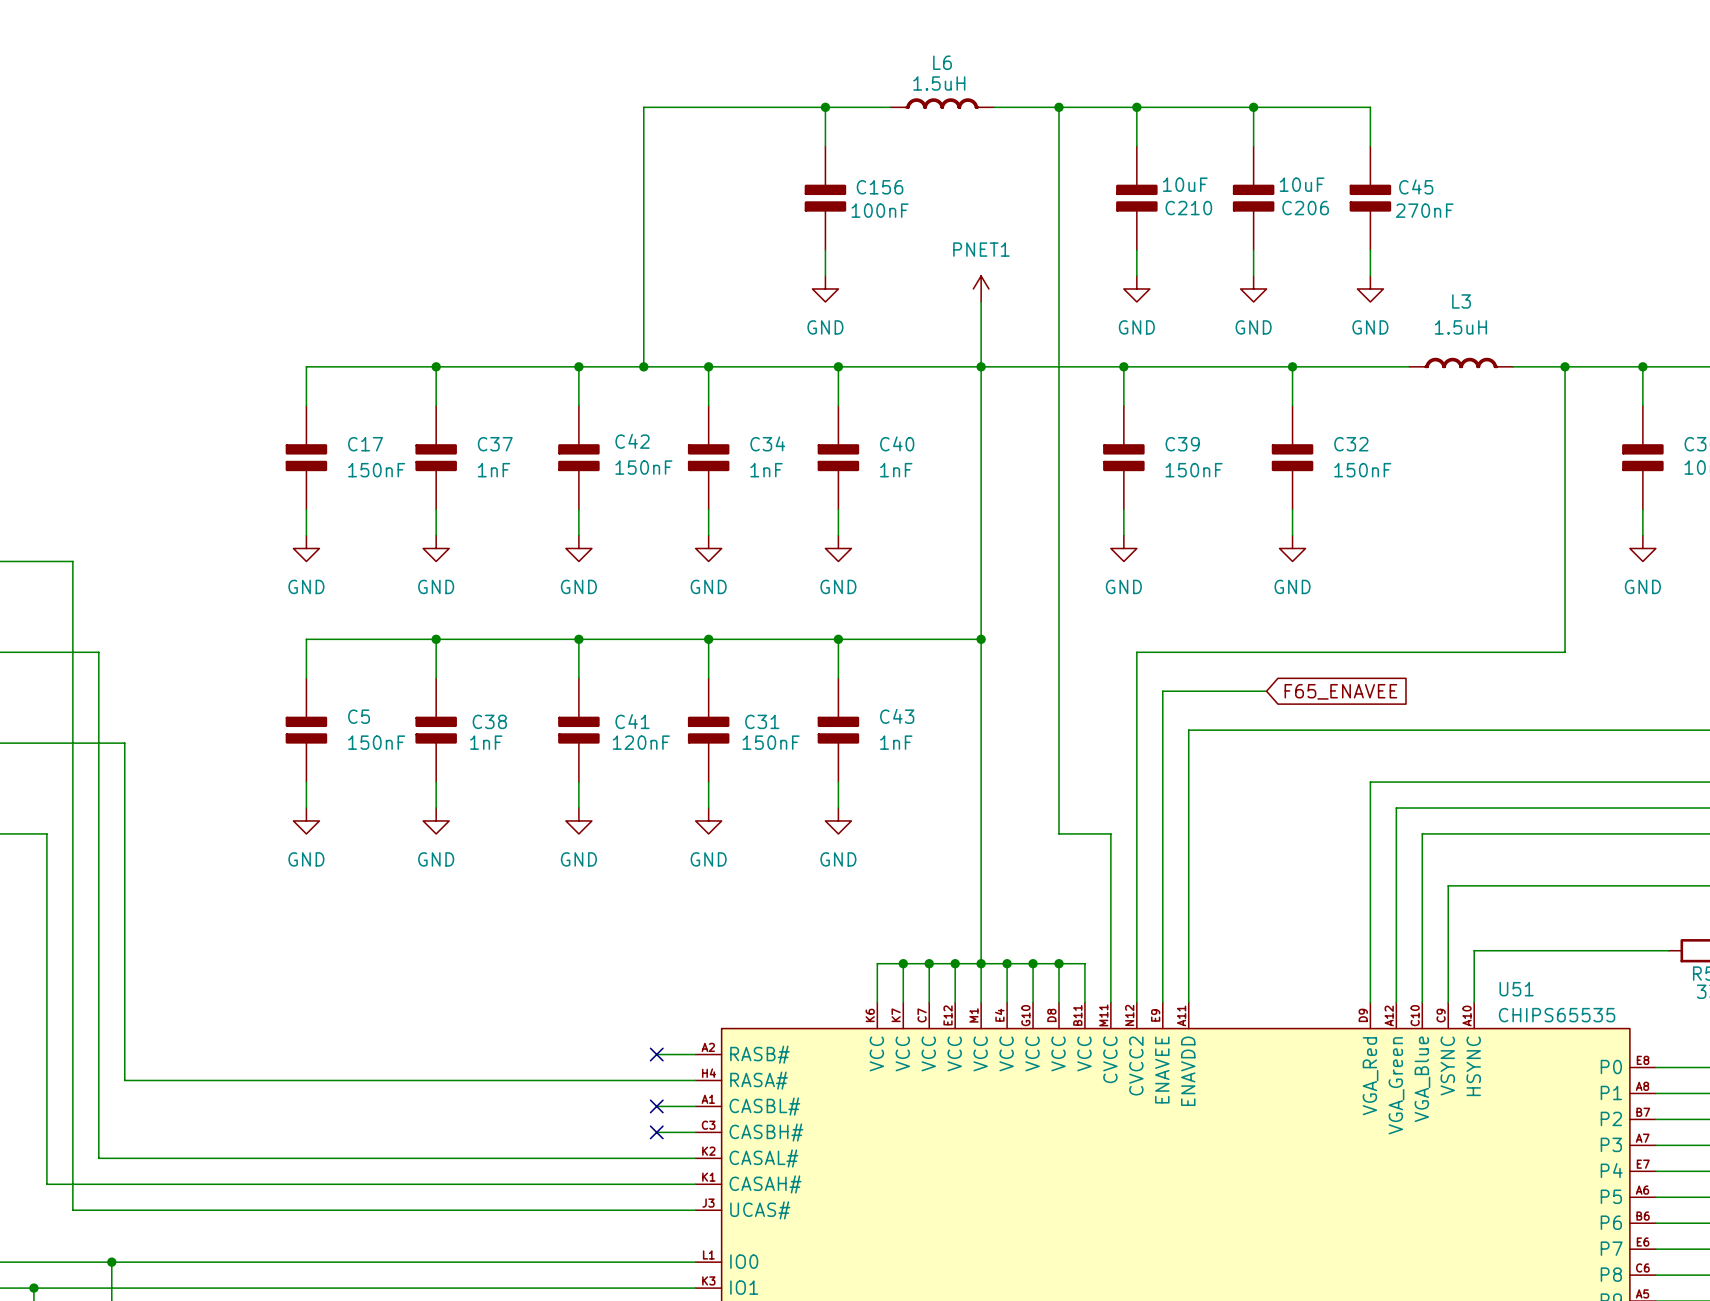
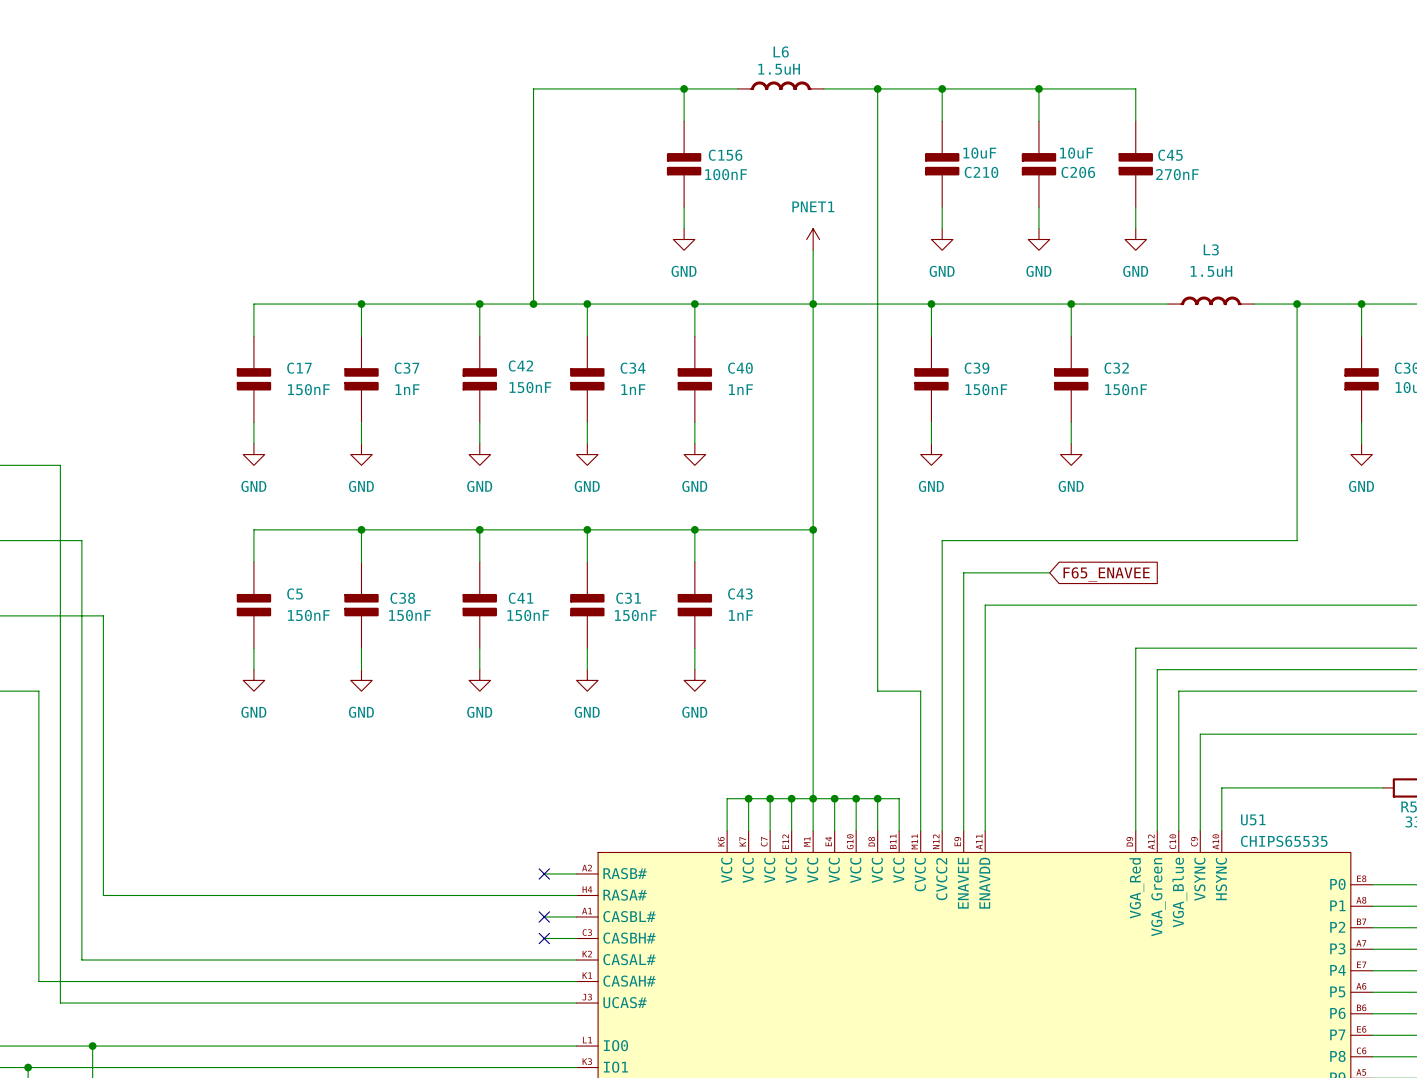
C38 value: 1nF (486, 742) -> 150nF (409, 615)
C41 value: 120nF (641, 742) -> 150nF (528, 615)

